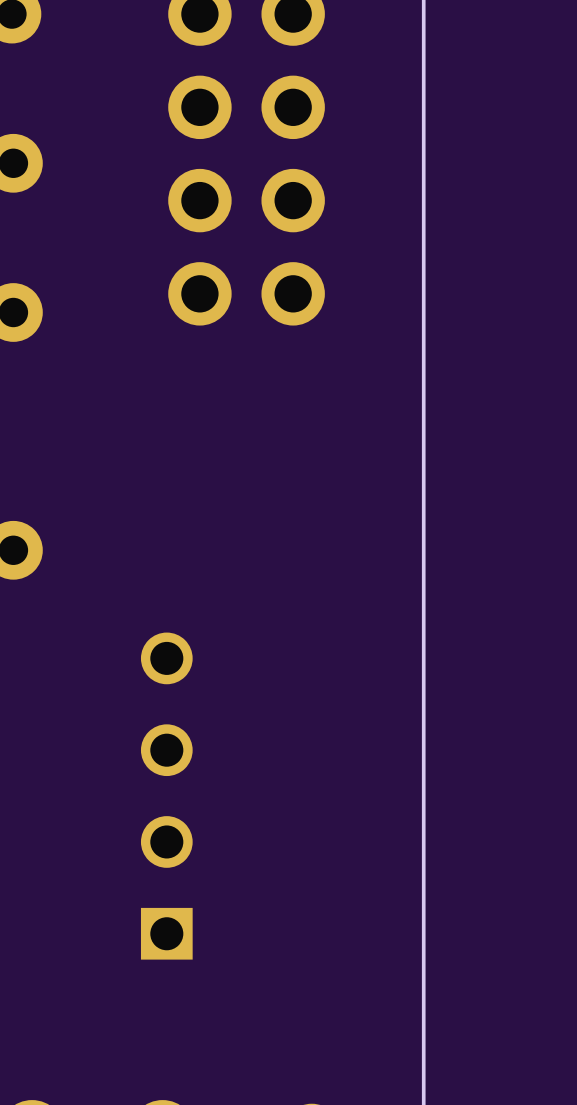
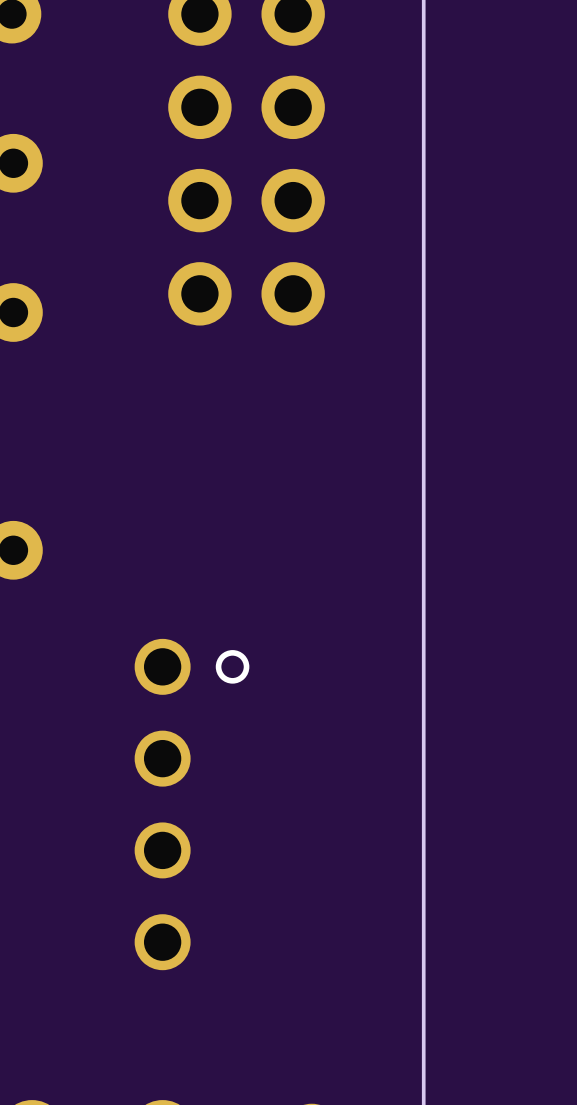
part footprint: [140, 632, 193, 960] -> [134, 638, 250, 971]

